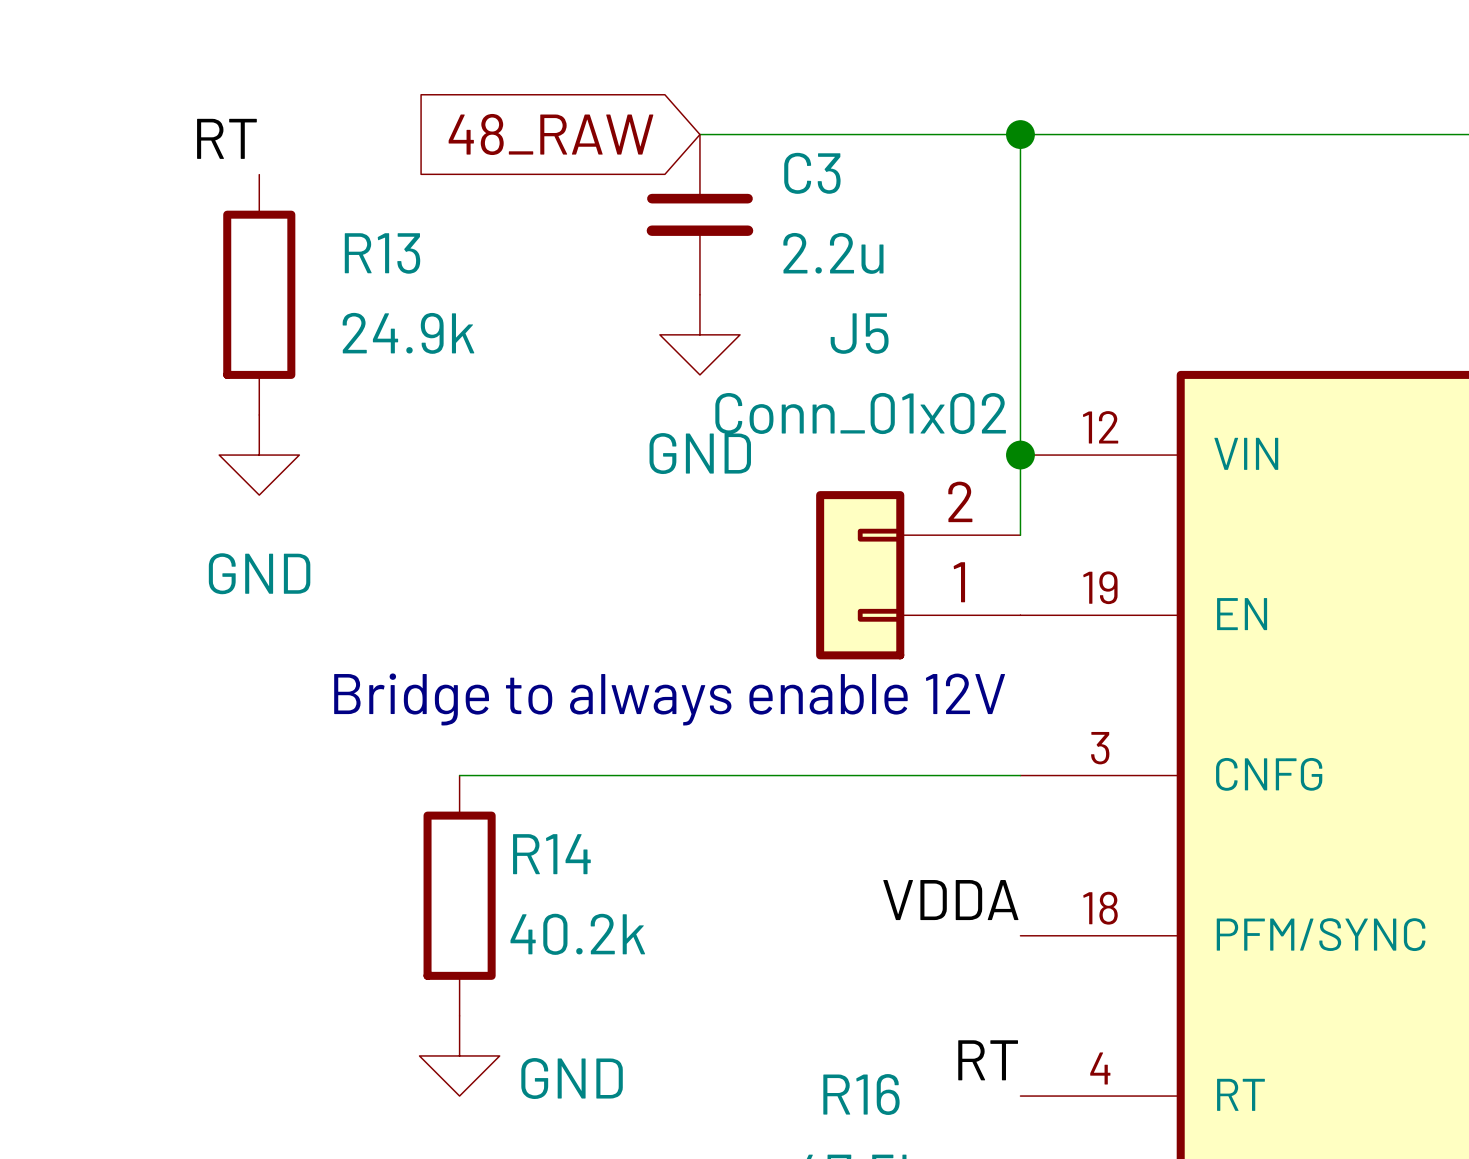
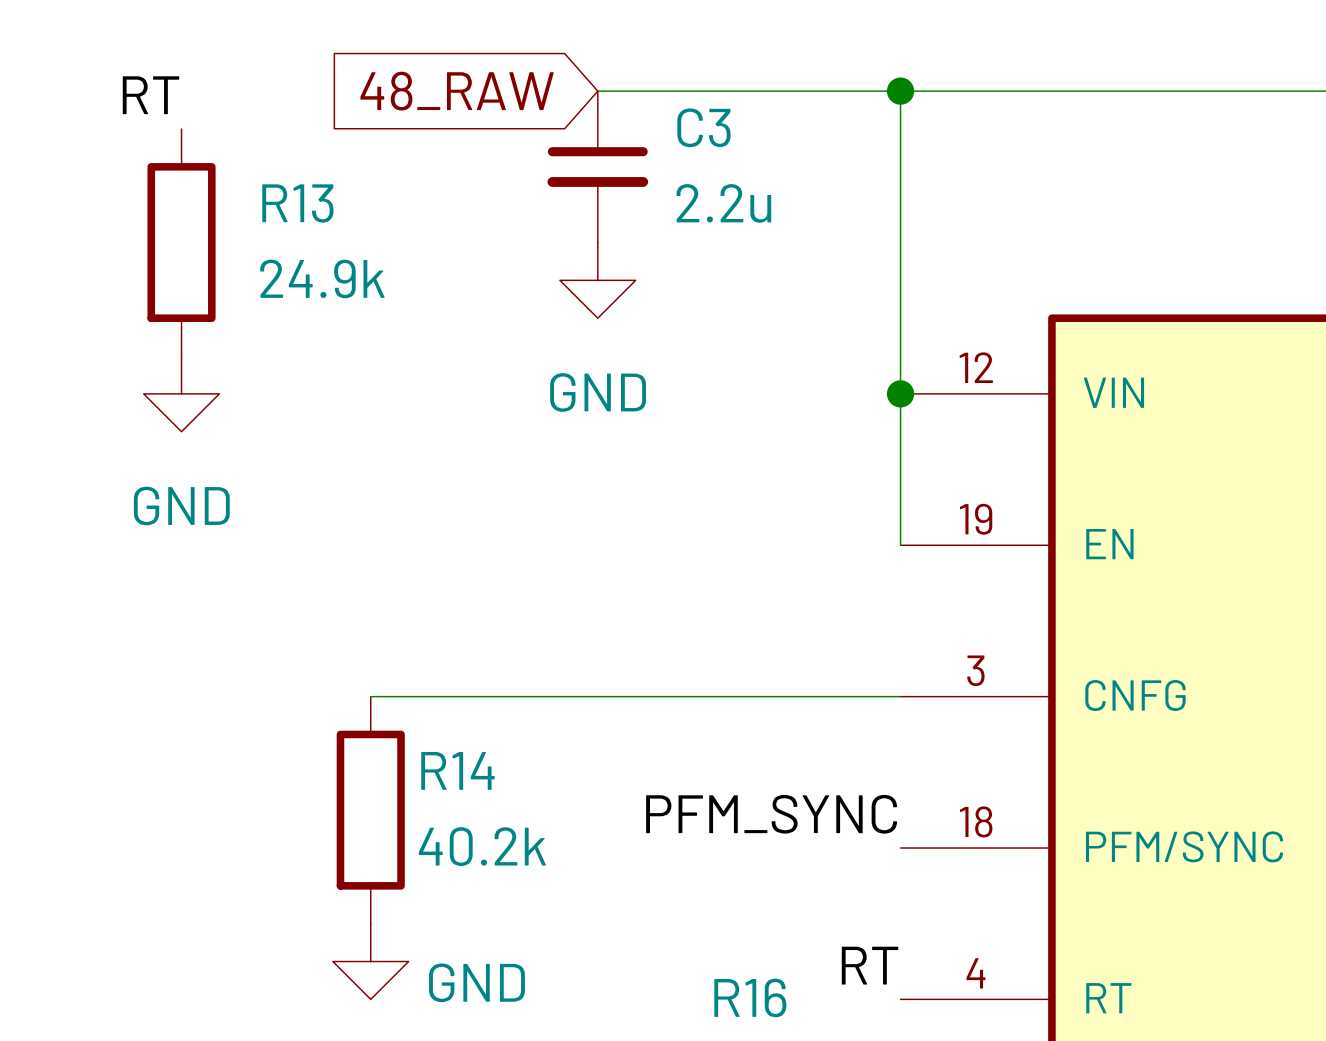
wire: none -> (900, 469) (900, 545)
J5: Conn_01x02 (918, 575) -> none
text: Bridge to always enable 12V (669, 699) -> none
label: VDDA (950, 900) -> PFM_SYNC (771, 814)

